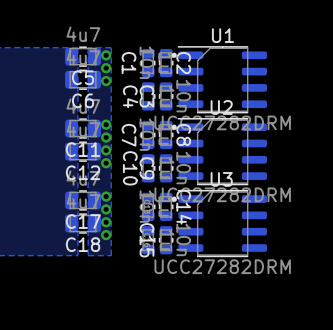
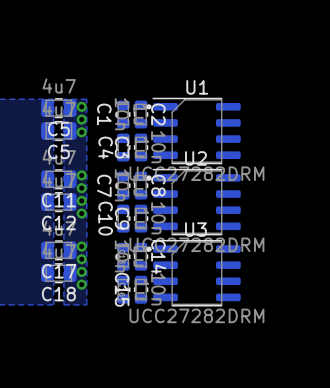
C6 name: C6 (83, 100) -> C5 (58, 151)

